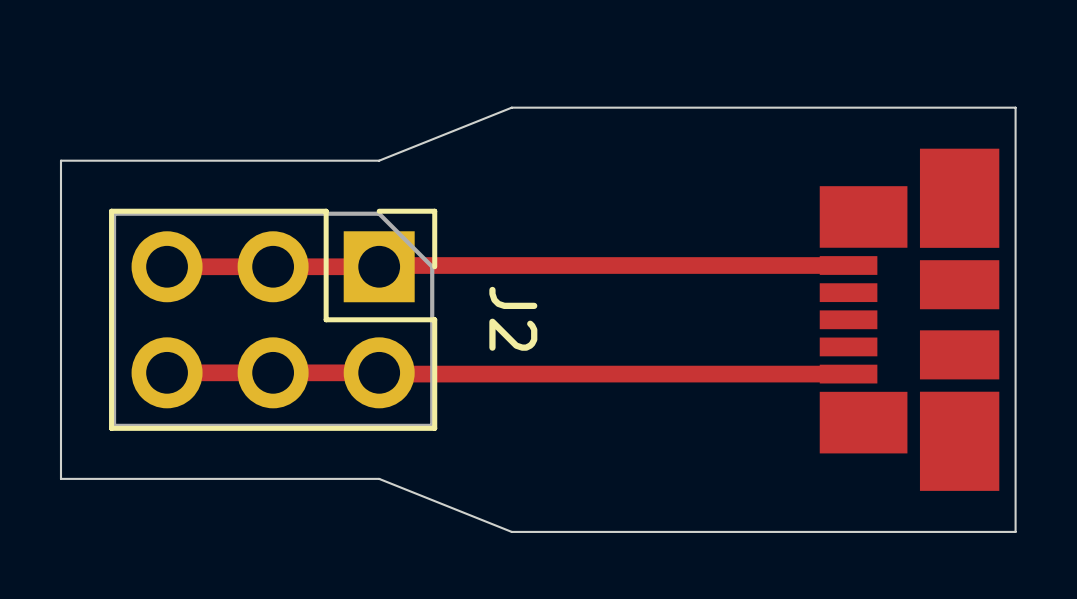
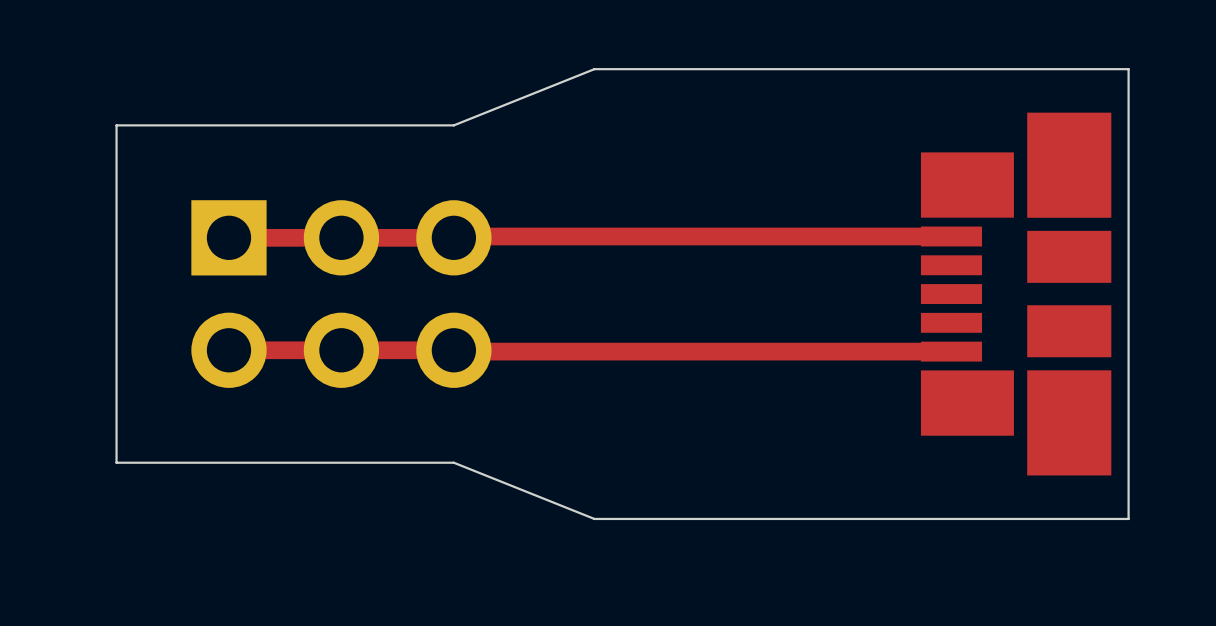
J2 side: bottom (273, 319) -> top (341, 294)

